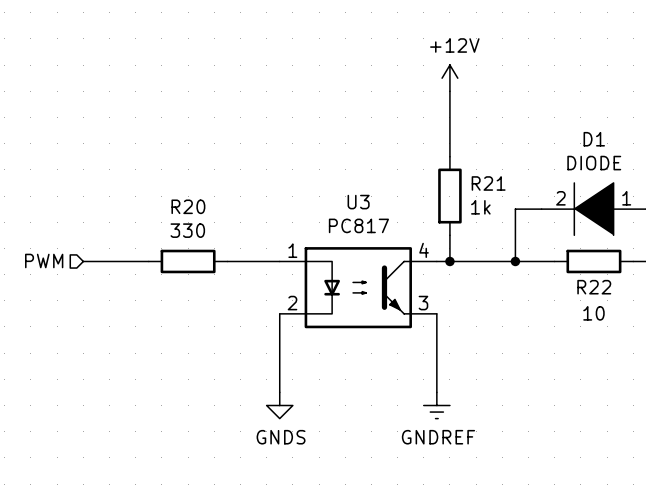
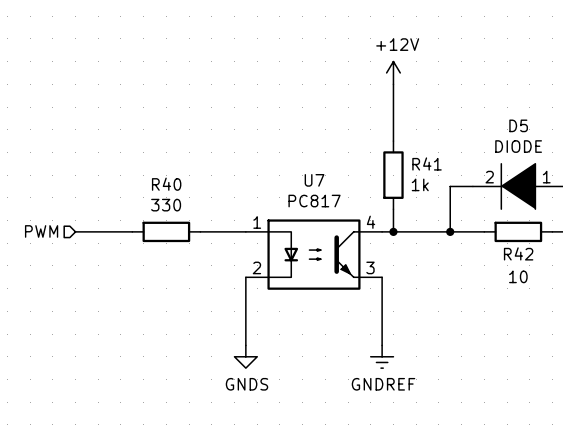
D1 name: D1 (594, 139) -> D5 (518, 125)
R21 name: R21 (488, 183) -> R41 (427, 163)
U3 name: U3 (358, 202) -> U7 (314, 180)
R20 name: R20 (188, 206) -> R40 (166, 184)
R22 name: R22 (594, 287) -> R42 (518, 253)

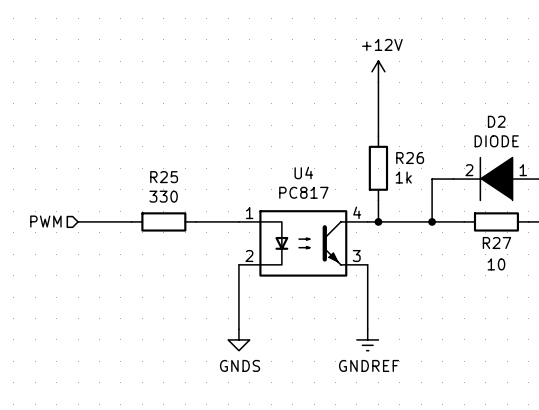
D5 name: D5 (518, 125) -> D2 (496, 121)
R41 name: R41 (427, 163) -> R26 (410, 158)
U7 name: U7 (314, 180) -> U4 (303, 173)
R40 name: R40 (166, 184) -> R25 (164, 177)
R42 name: R42 (518, 253) -> R27 (496, 243)

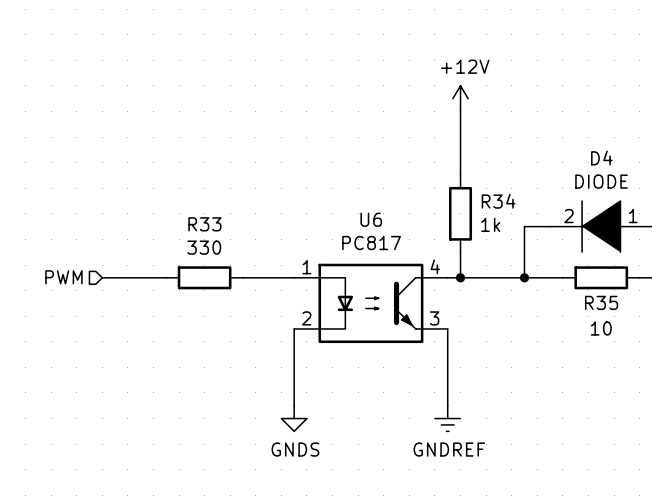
D2 name: D2 (496, 121) -> D4 (601, 158)
R26 name: R26 (410, 158) -> R34 (498, 201)
U4 name: U4 (303, 173) -> U6 (371, 219)
R25 name: R25 (164, 177) -> R33 (204, 224)
R27 name: R27 (496, 243) -> R35 (601, 302)

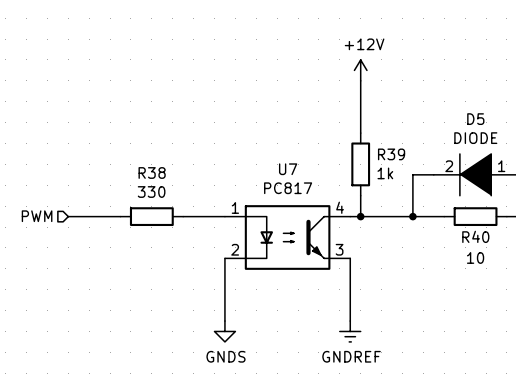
D4 name: D4 (601, 158) -> D5 (475, 119)
R34 name: R34 (498, 201) -> R39 (391, 154)
U6 name: U6 (371, 219) -> U7 (288, 169)
R33 name: R33 (204, 224) -> R38 (152, 172)
R35 name: R35 (601, 302) -> R40 (475, 236)

